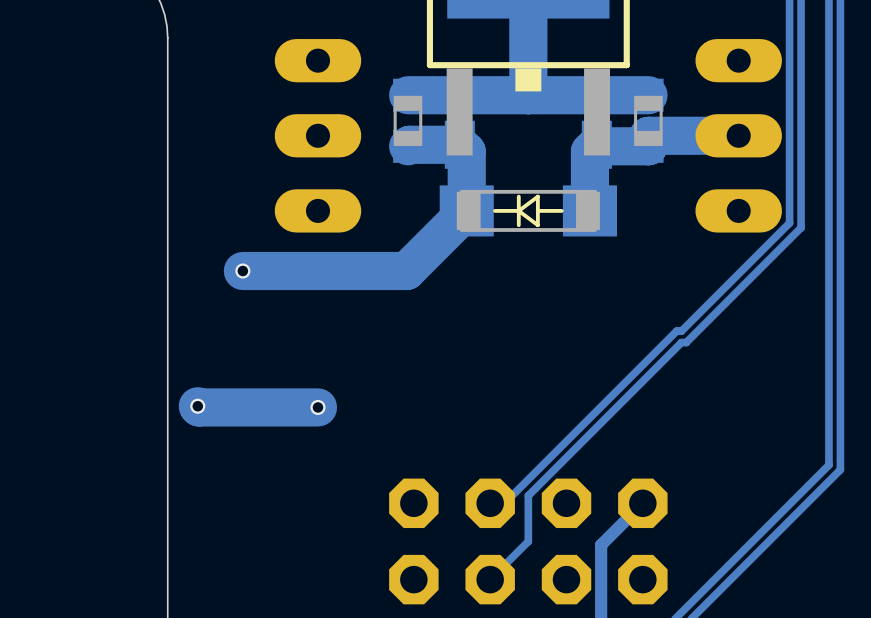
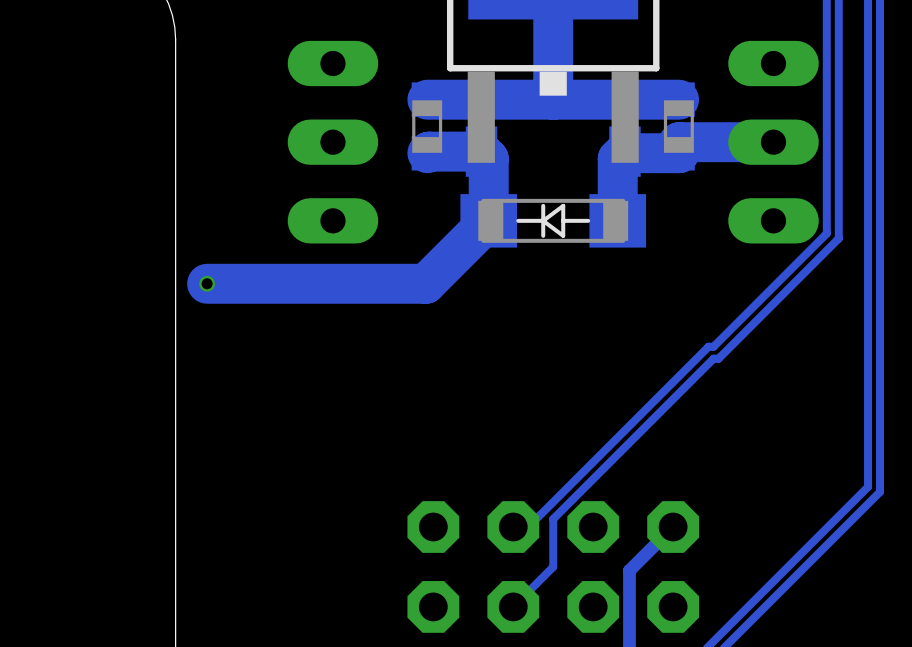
track: none -> (254, 283) (207, 283)
via position: (242, 271) -> (207, 283)
track: (197, 406) (317, 407) -> none
via: (197, 406) -> none
via: (317, 407) -> none

